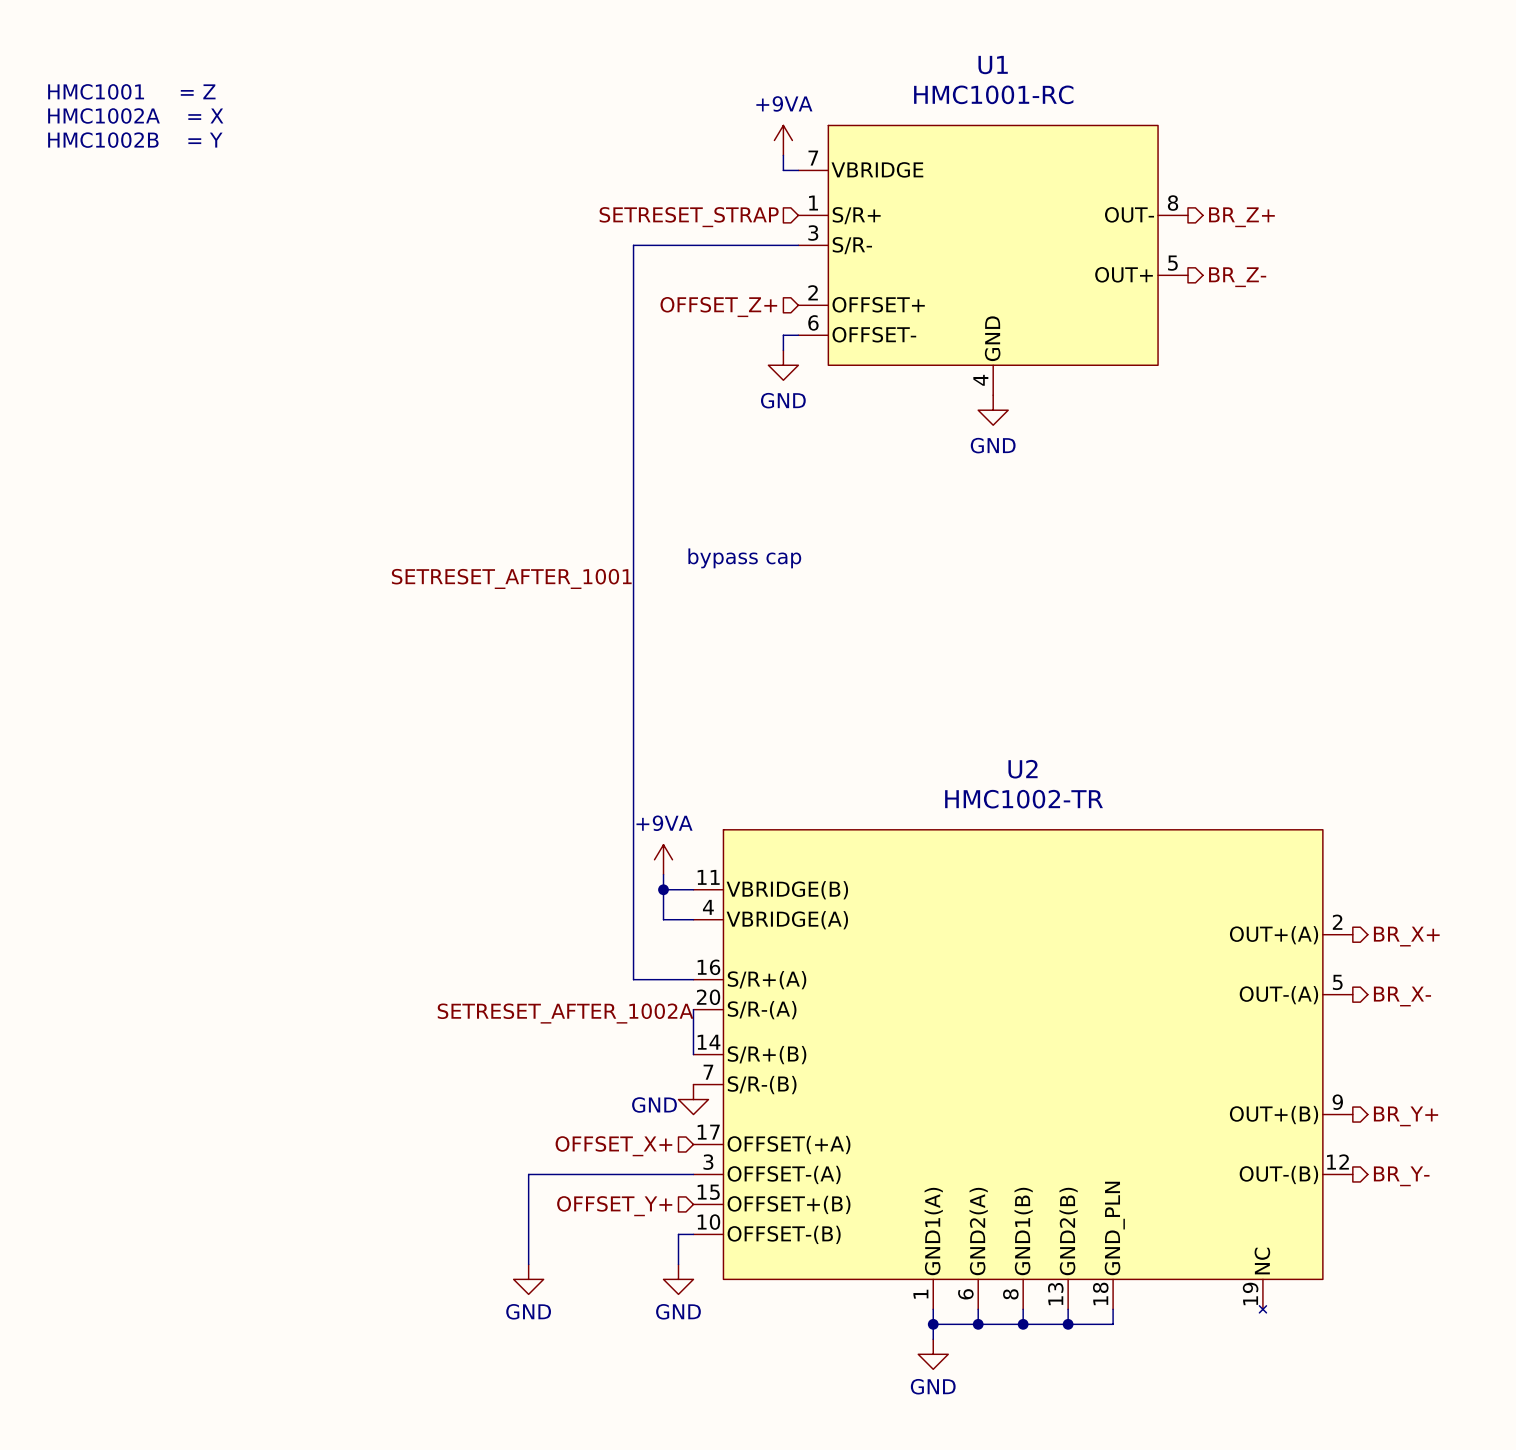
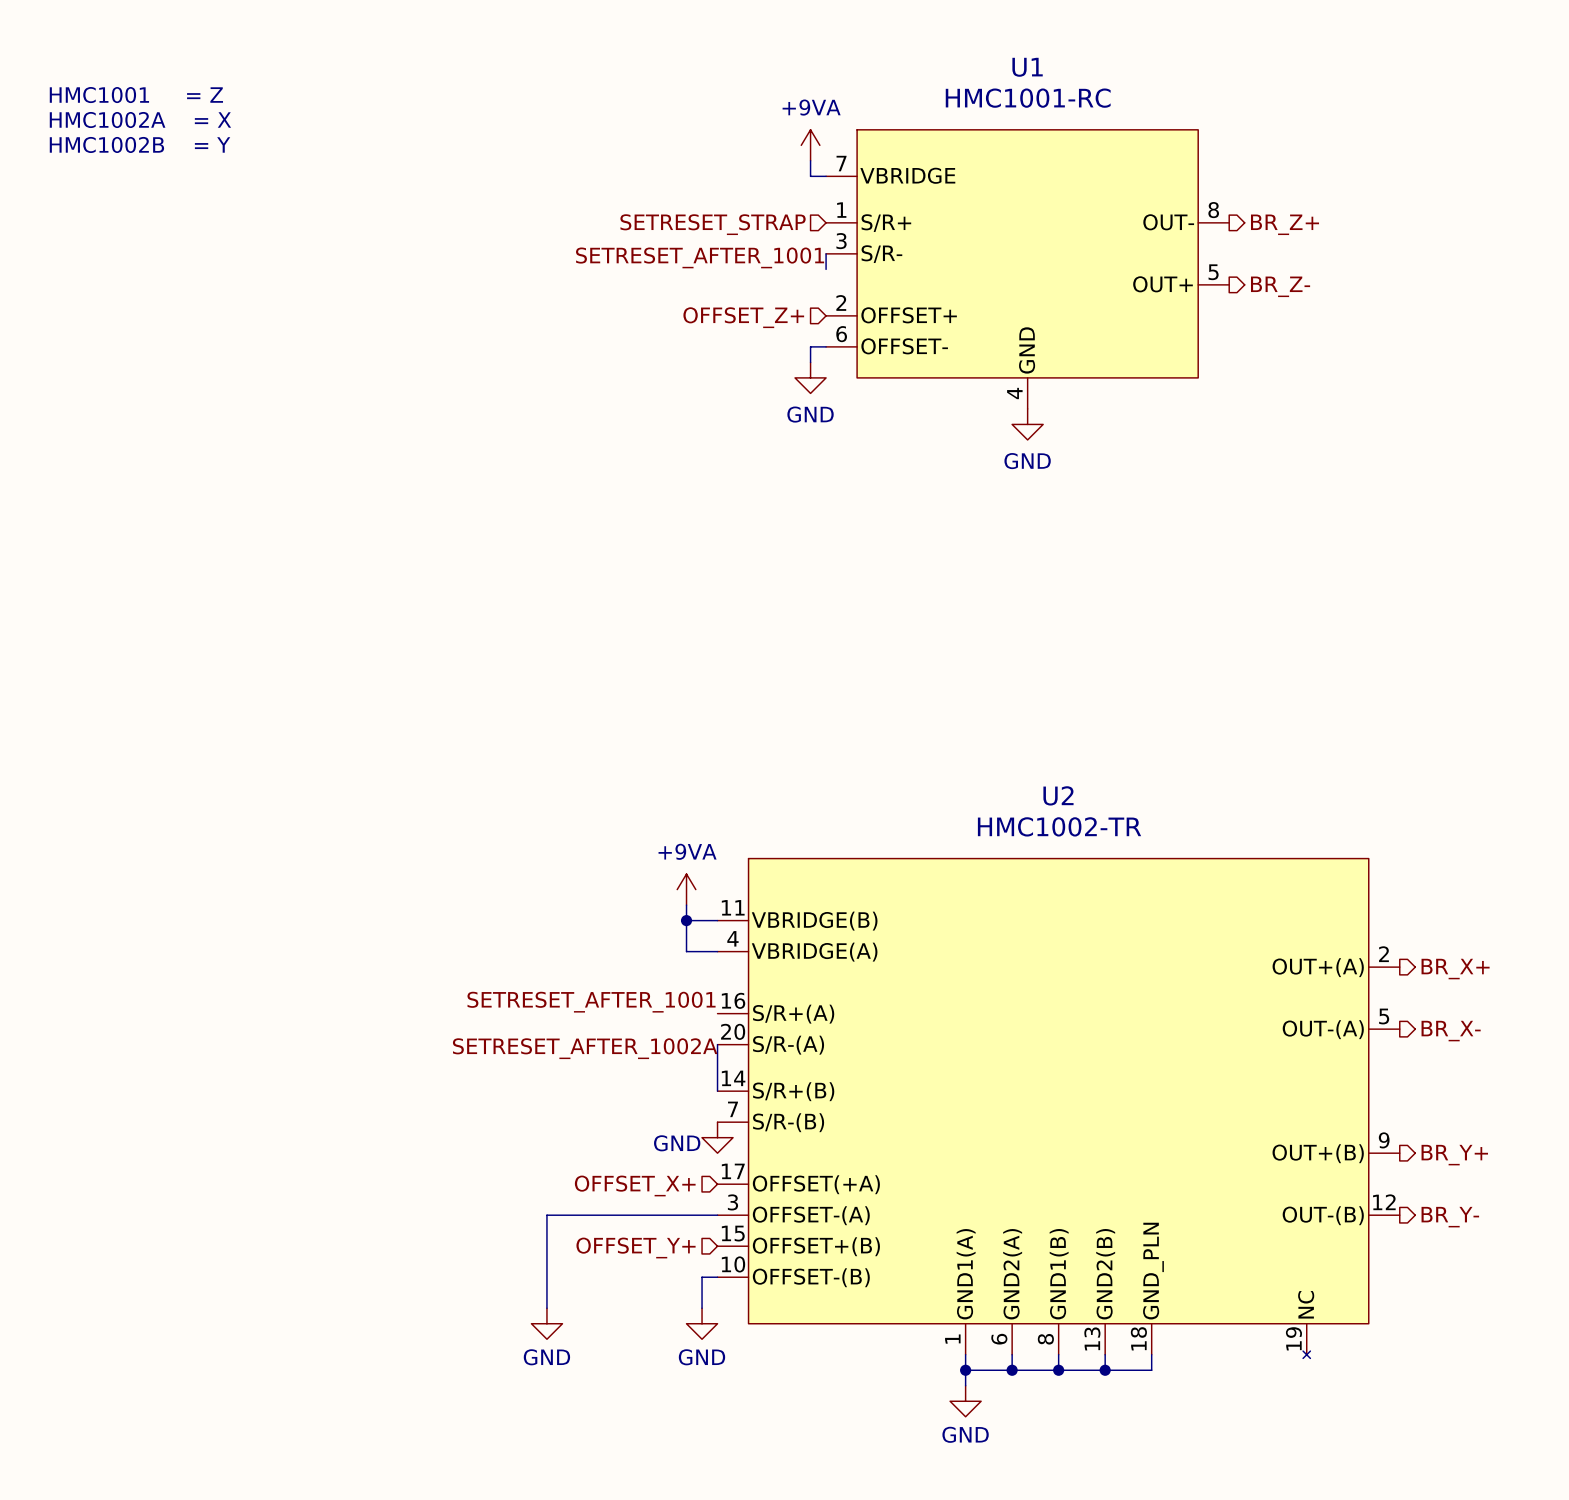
wire: (798, 245) (633, 245) (633, 979) (693, 979) -> (826, 253) (826, 269)
label: none -> SETRESET_AFTER_1001 (700, 257)
text: bypass cap (744, 558) -> none
label: SETRESET_AFTER_1001 (511, 578) -> none
label: none -> SETRESET_AFTER_1001 (591, 1002)

